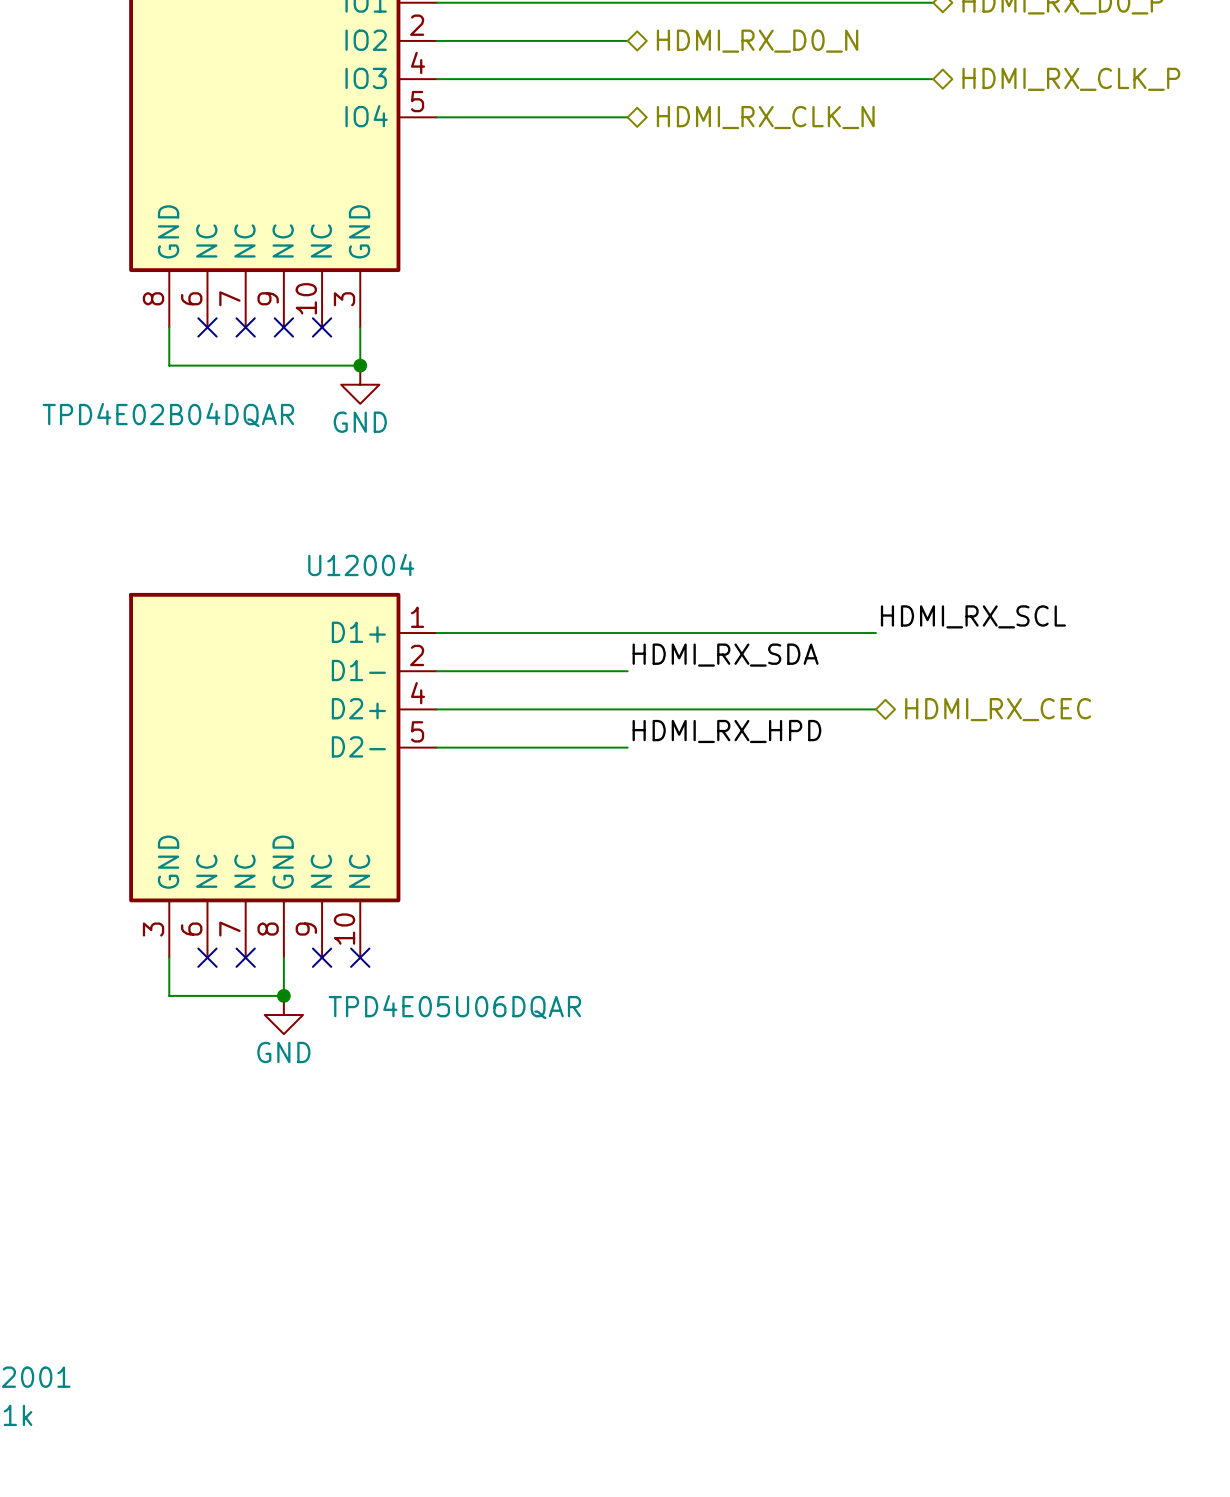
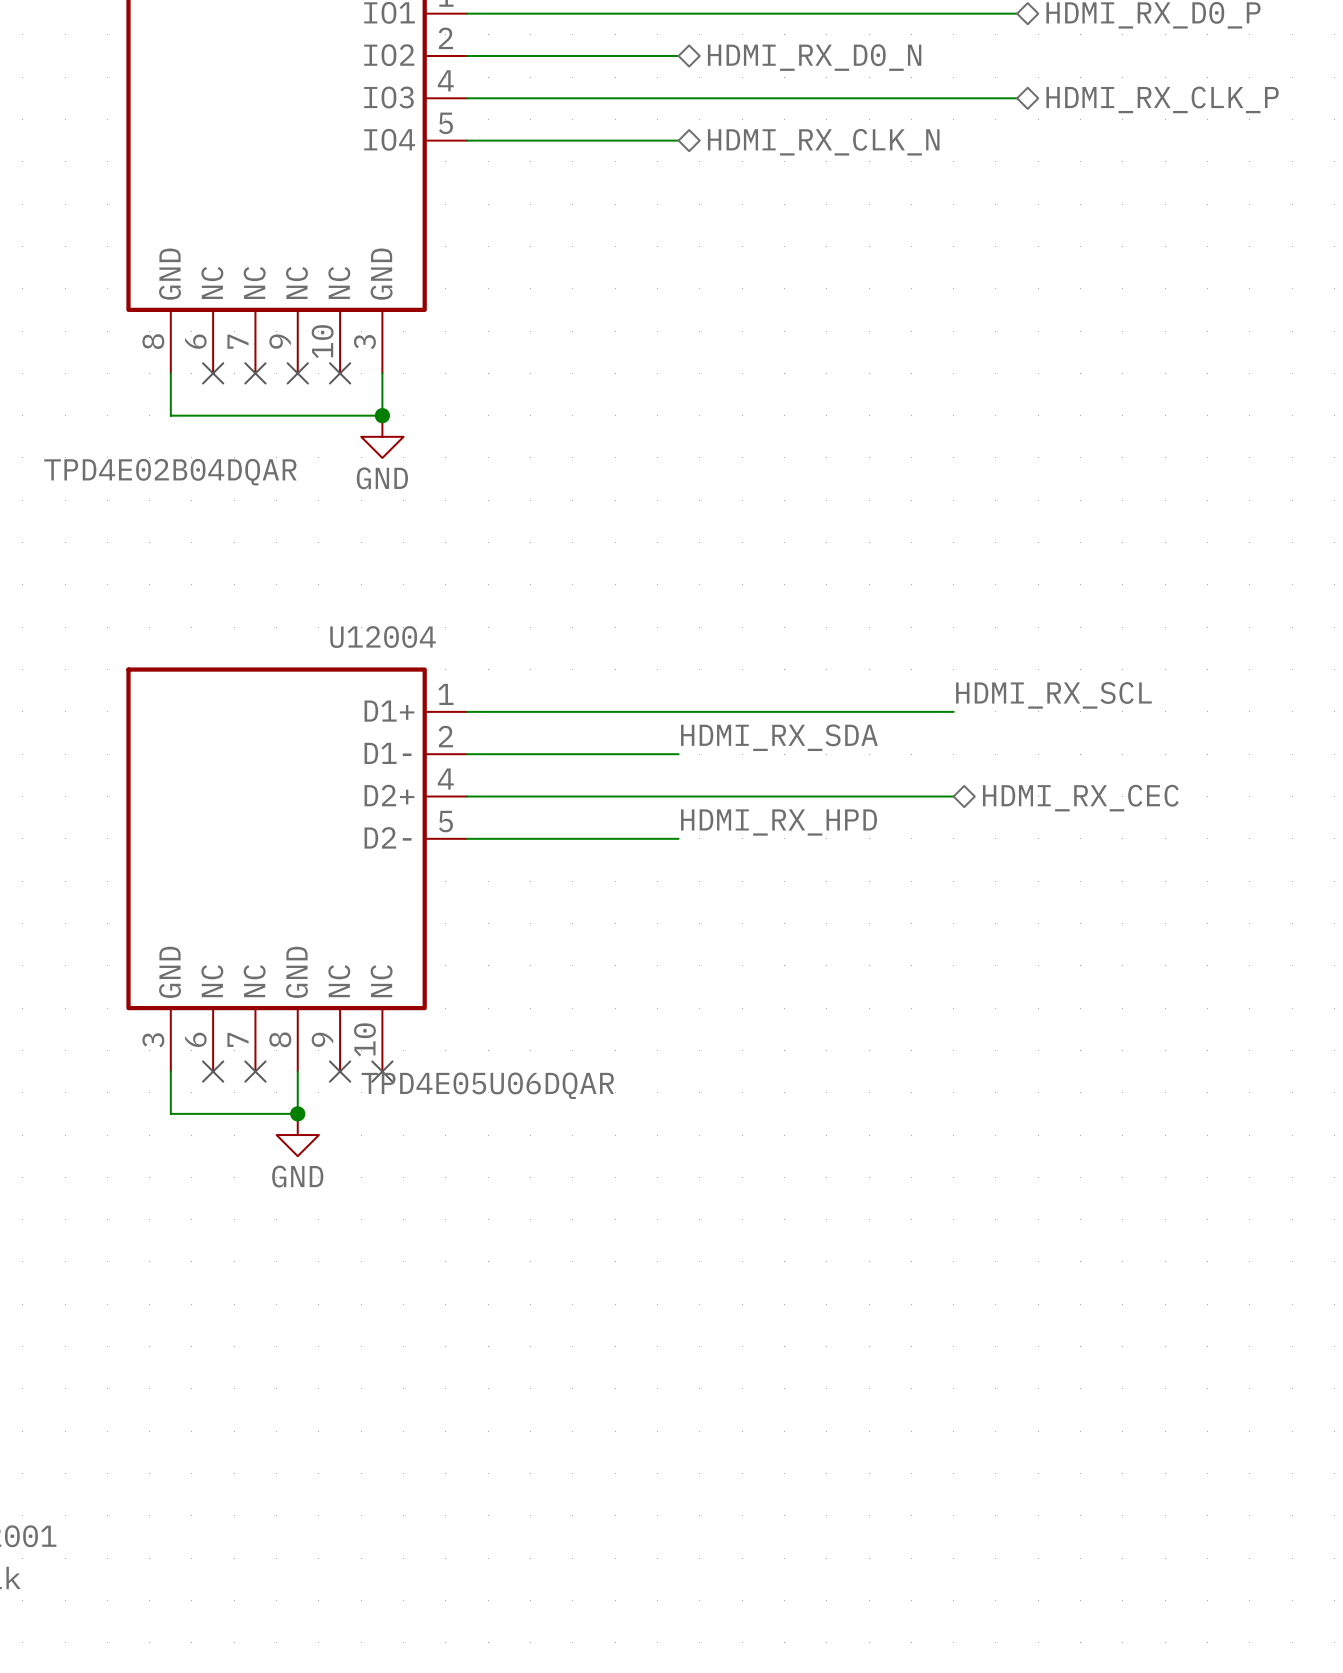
U12004 value position: TPD4E05U06DQAR (454, 1007) -> TPD4E05U06DQAR (487, 1085)

